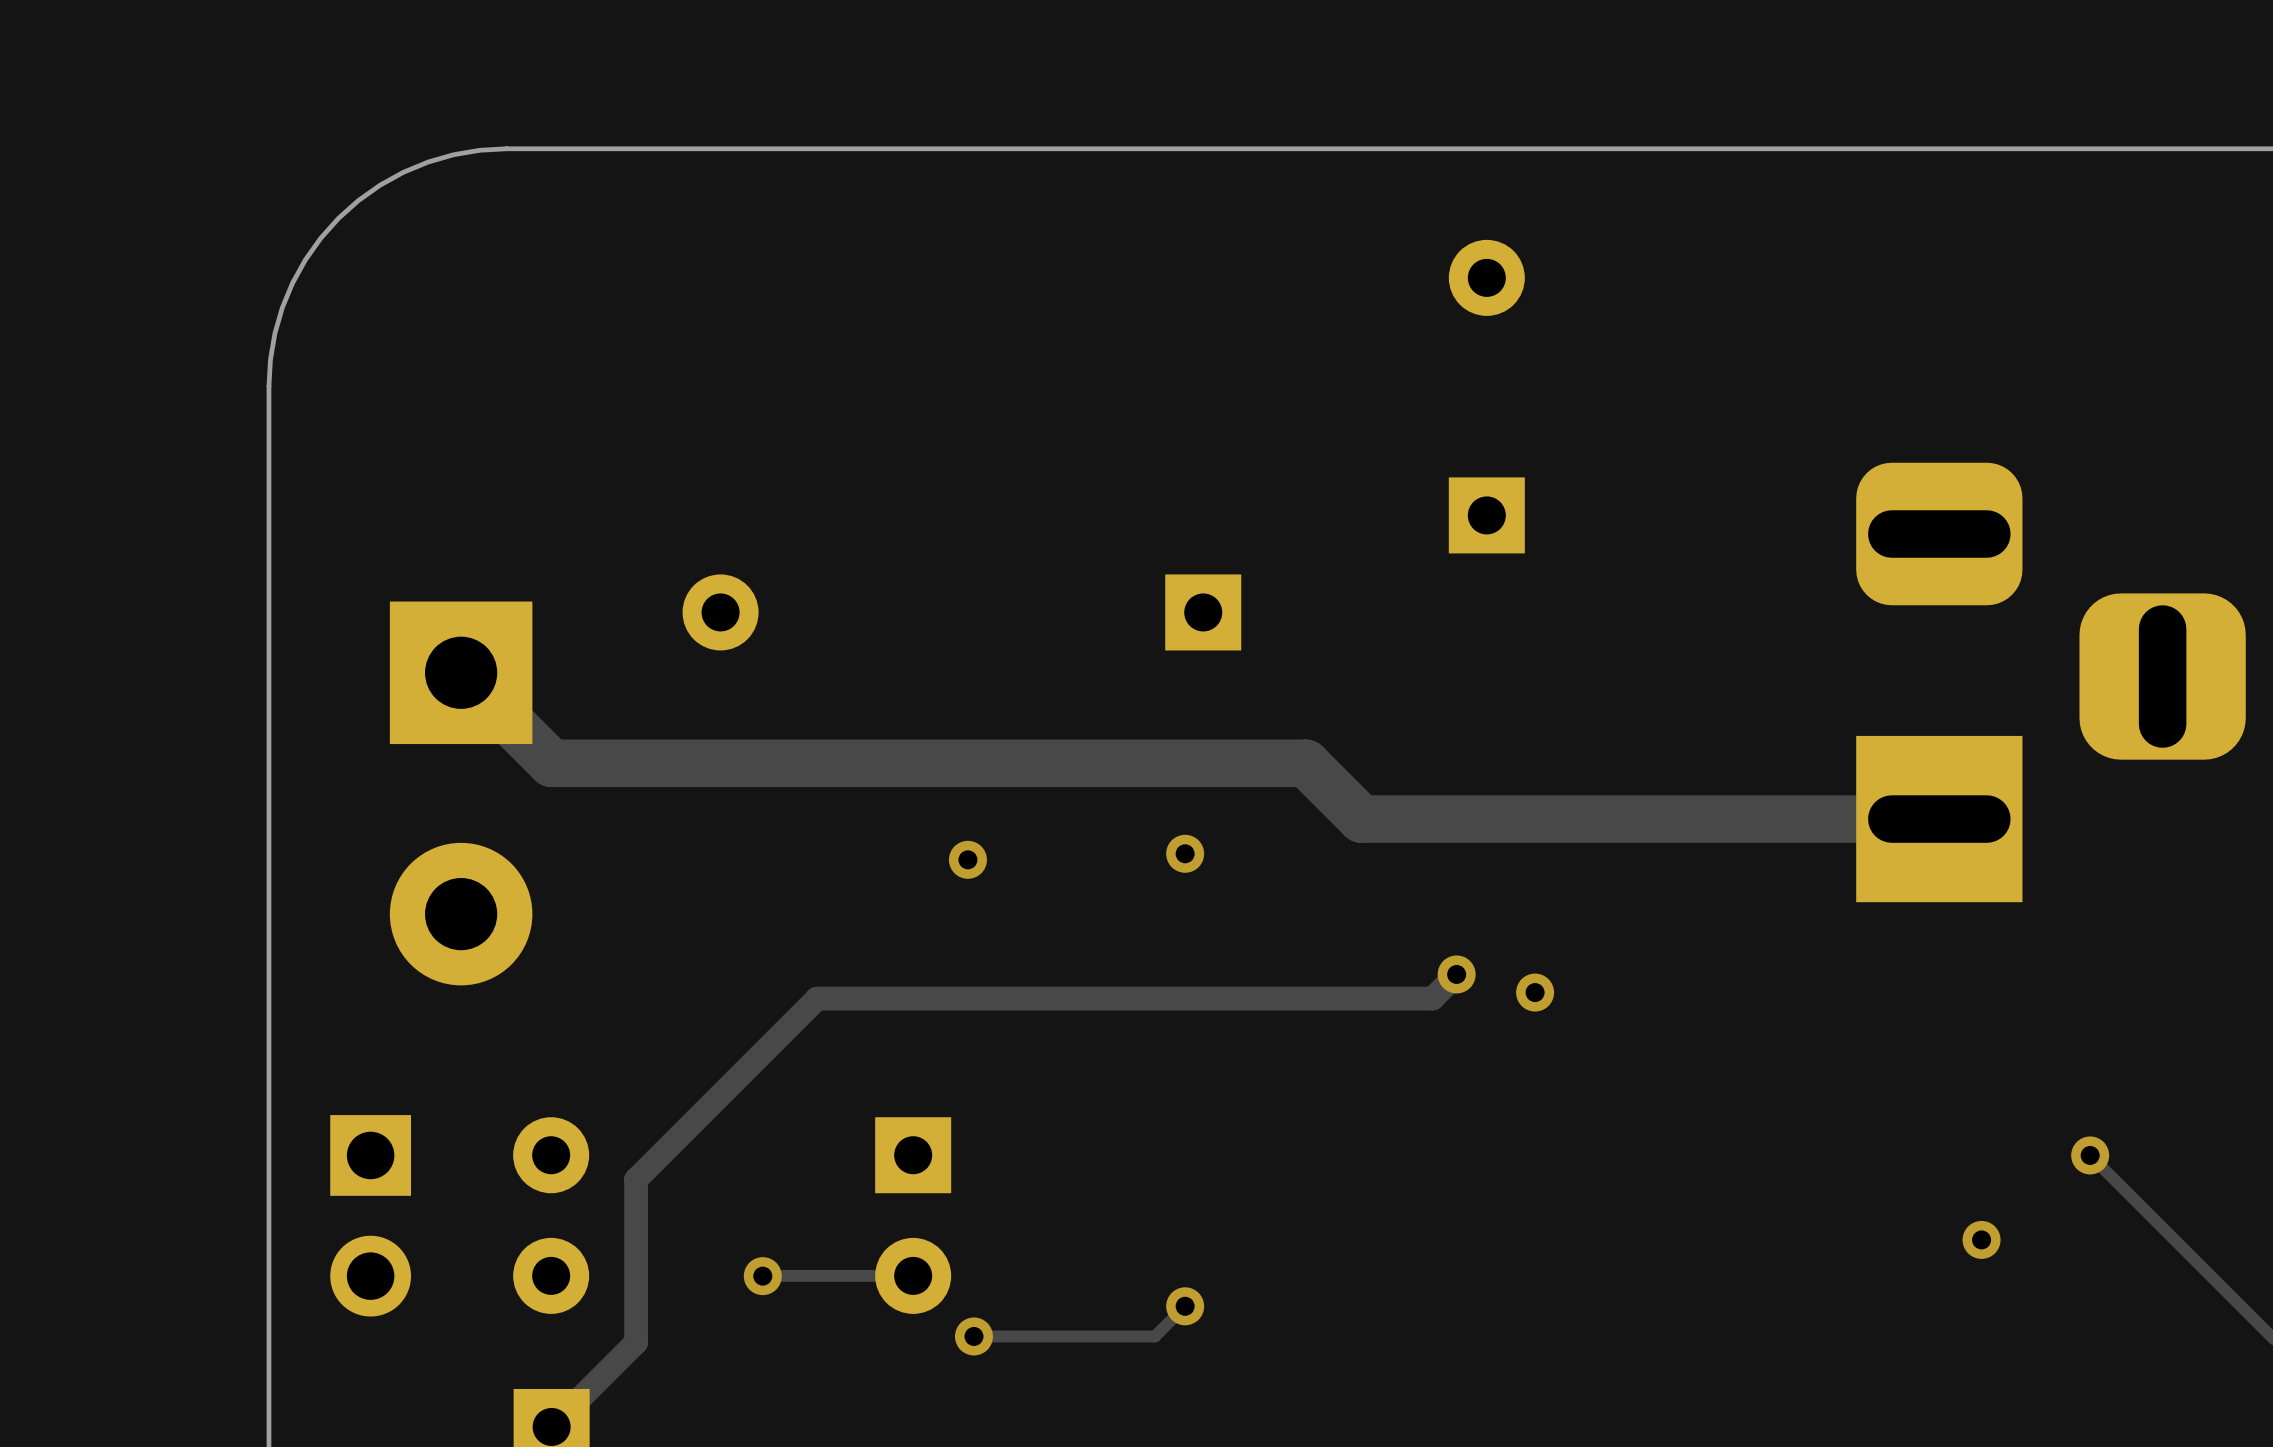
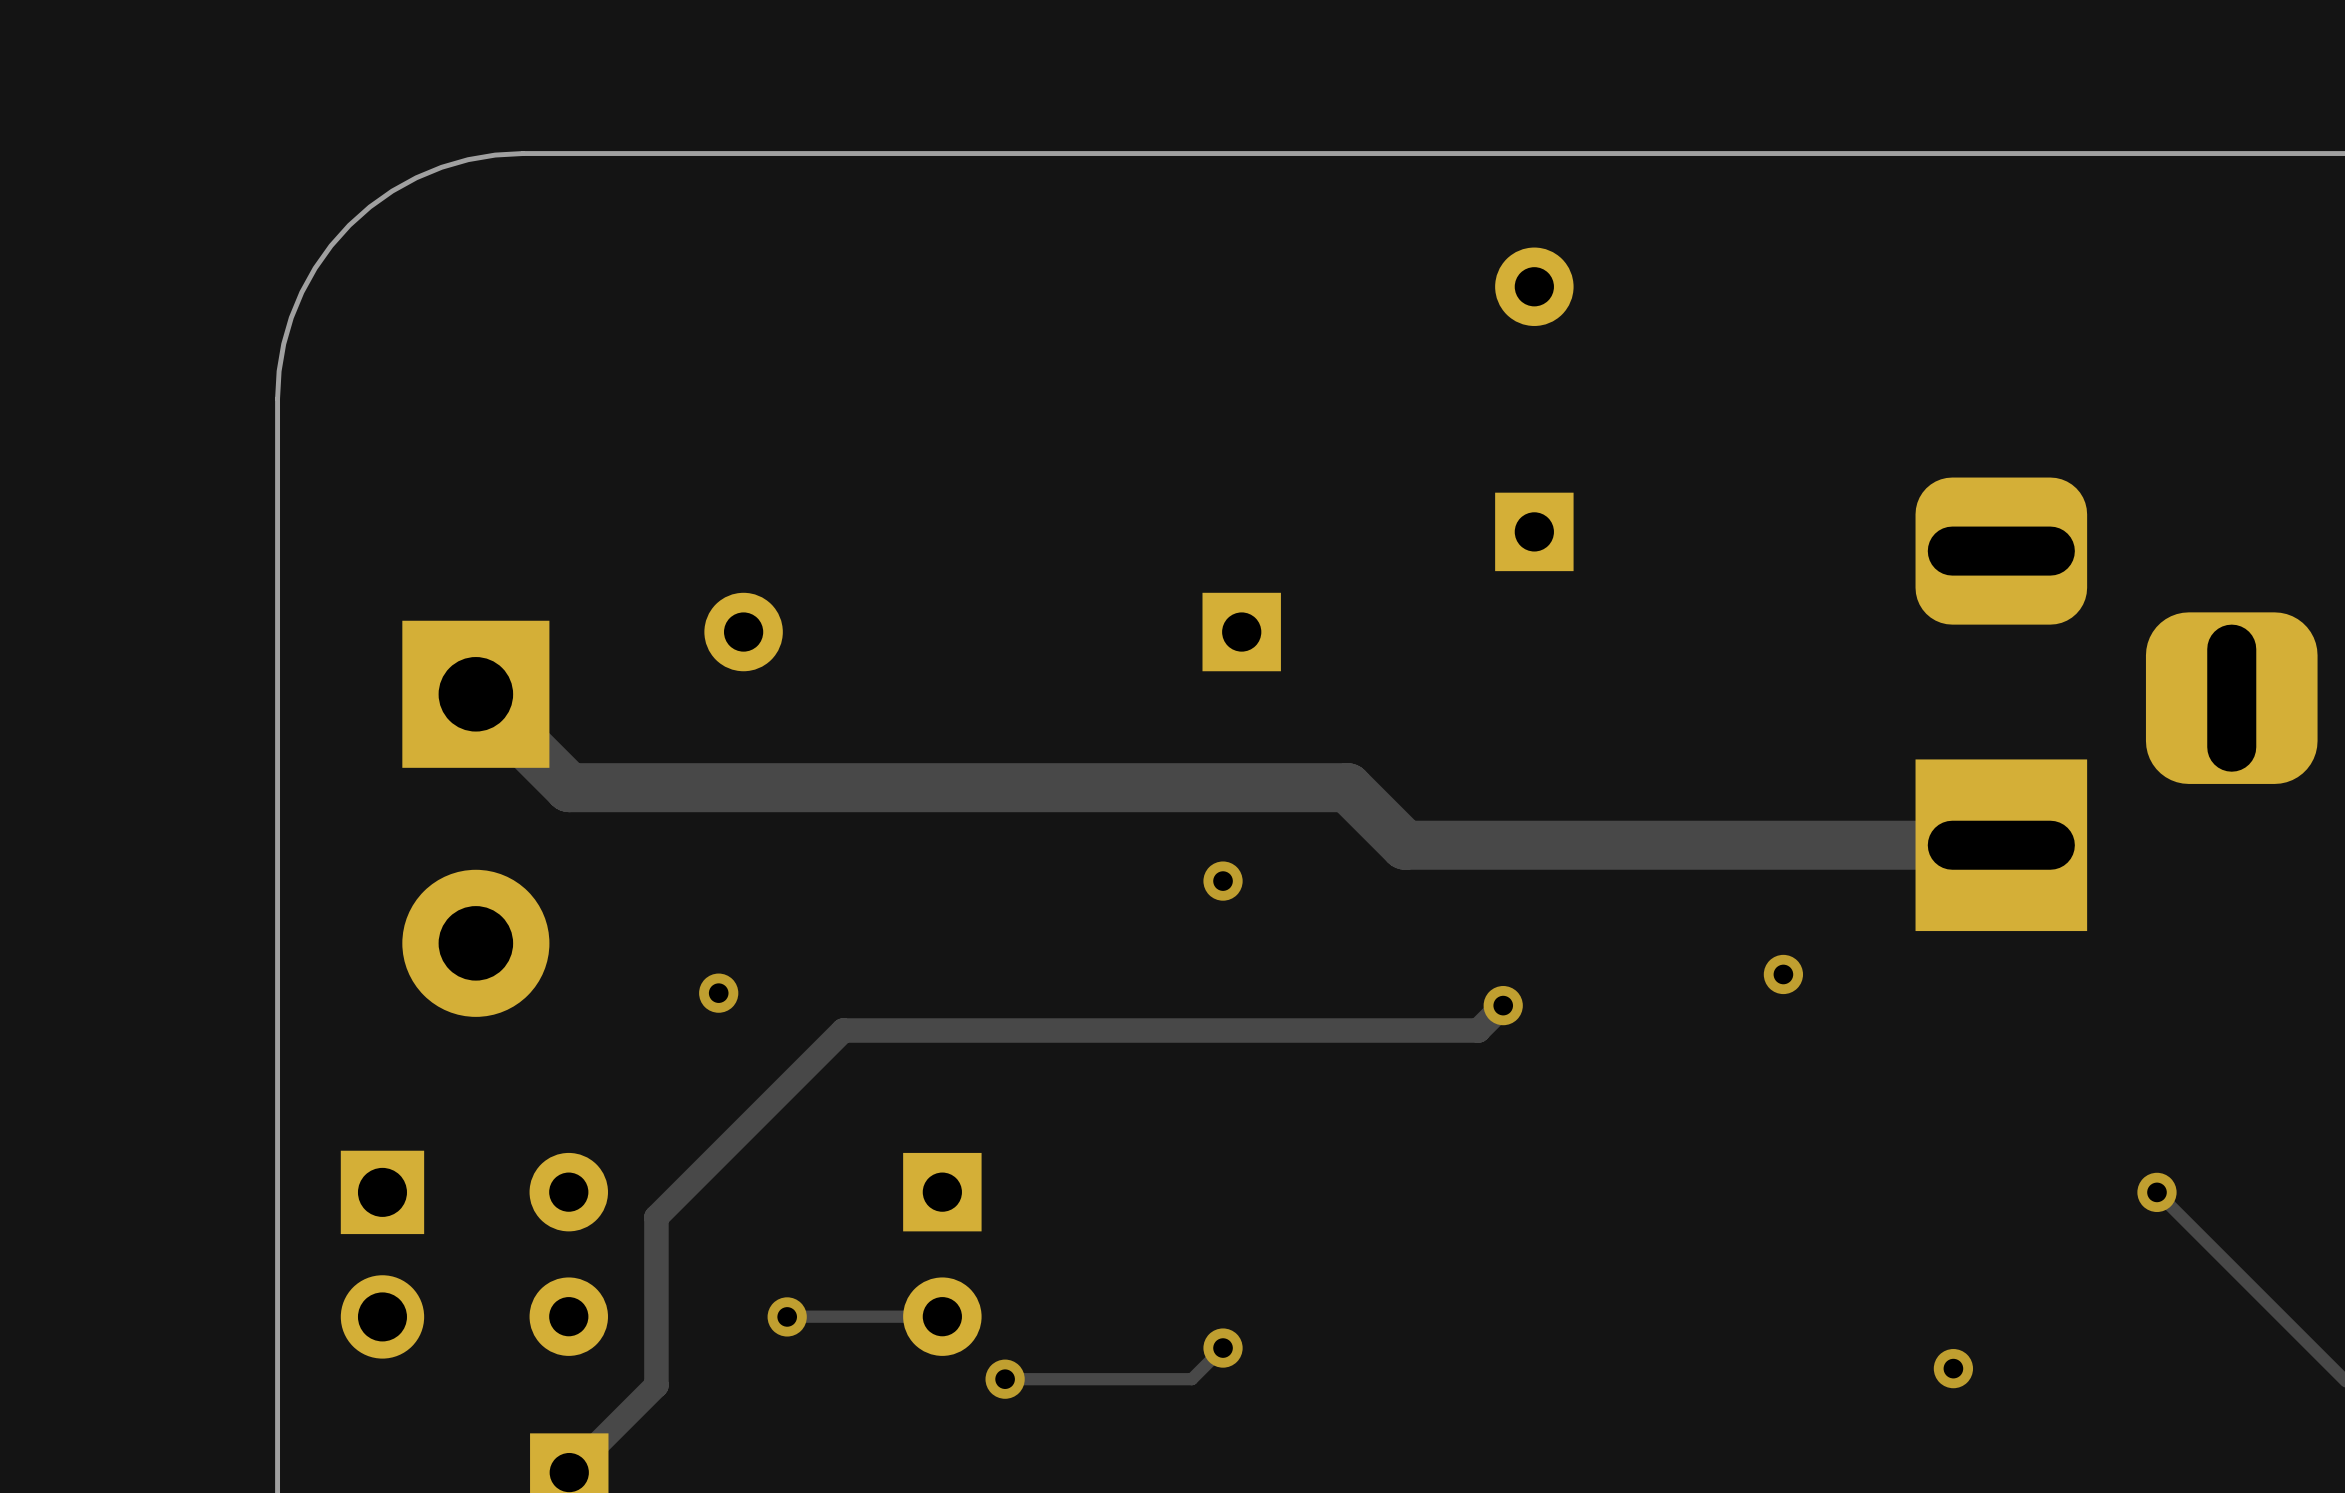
via: (967, 859) -> none
via: none -> (1783, 974)
via: none -> (718, 993)
via: (1535, 992) -> none
via: (1981, 1239) -> none
via: none -> (1953, 1368)

